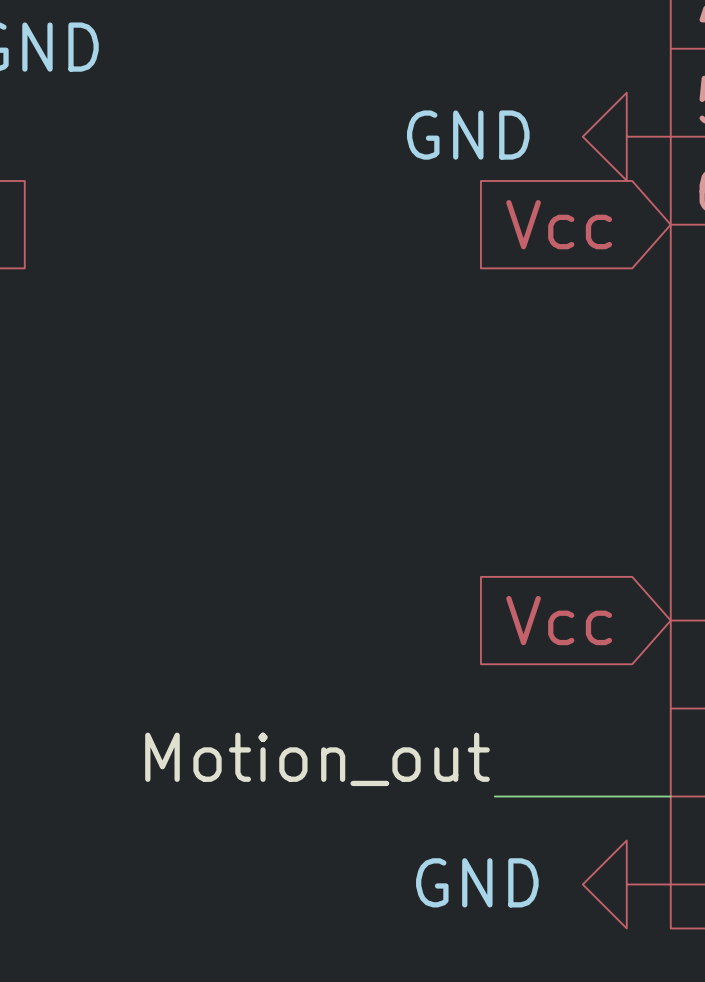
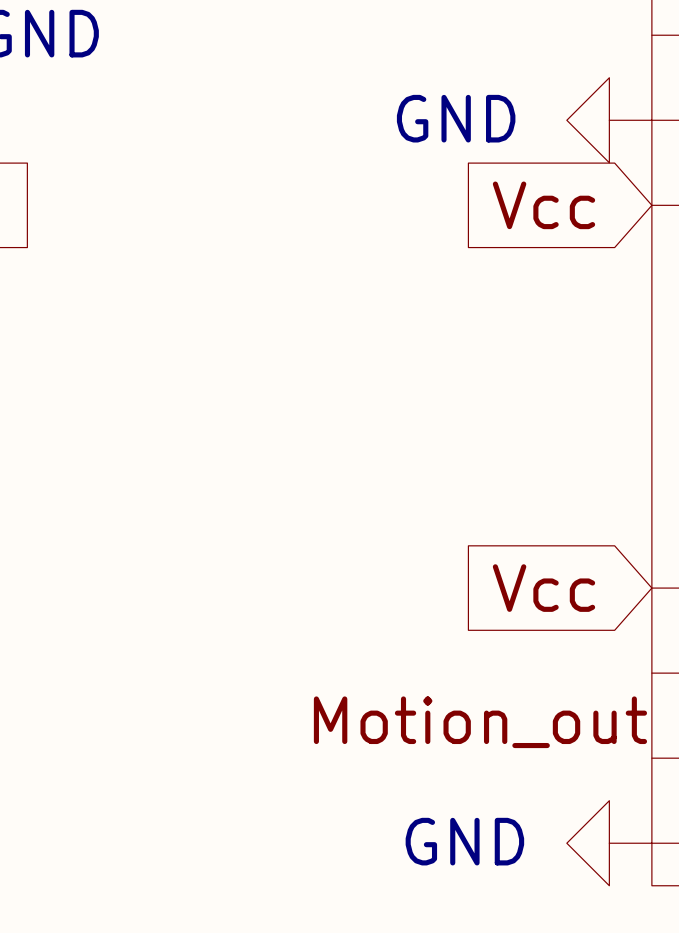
label position: Motion_out (317, 759) -> Motion_out (480, 722)
wire: (494, 796) (670, 796) -> none

